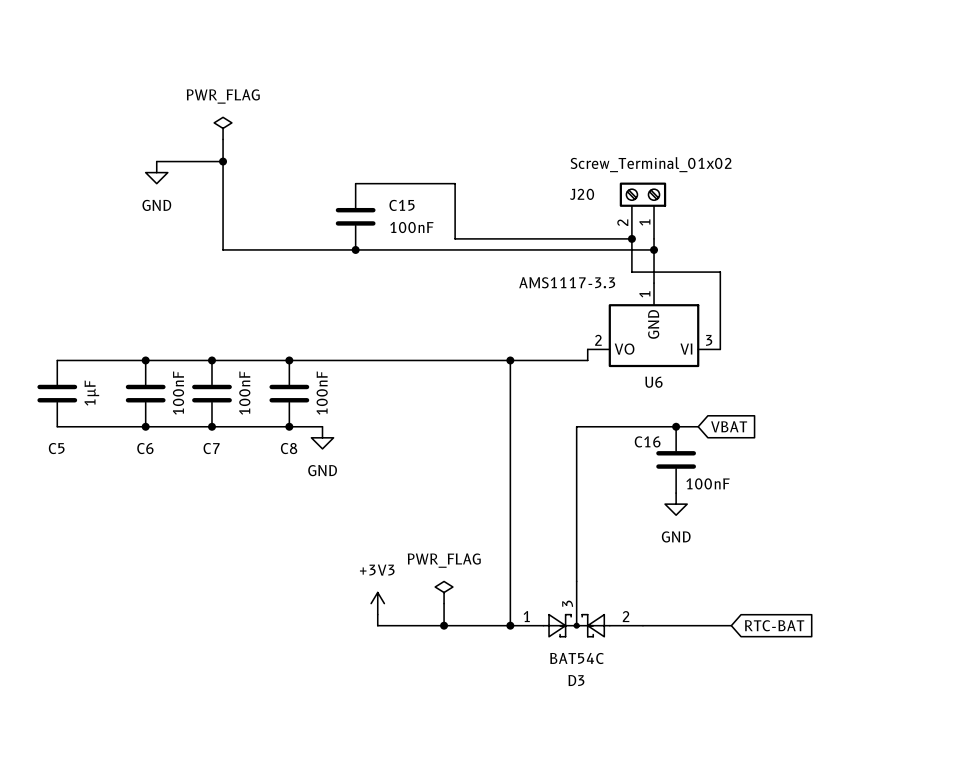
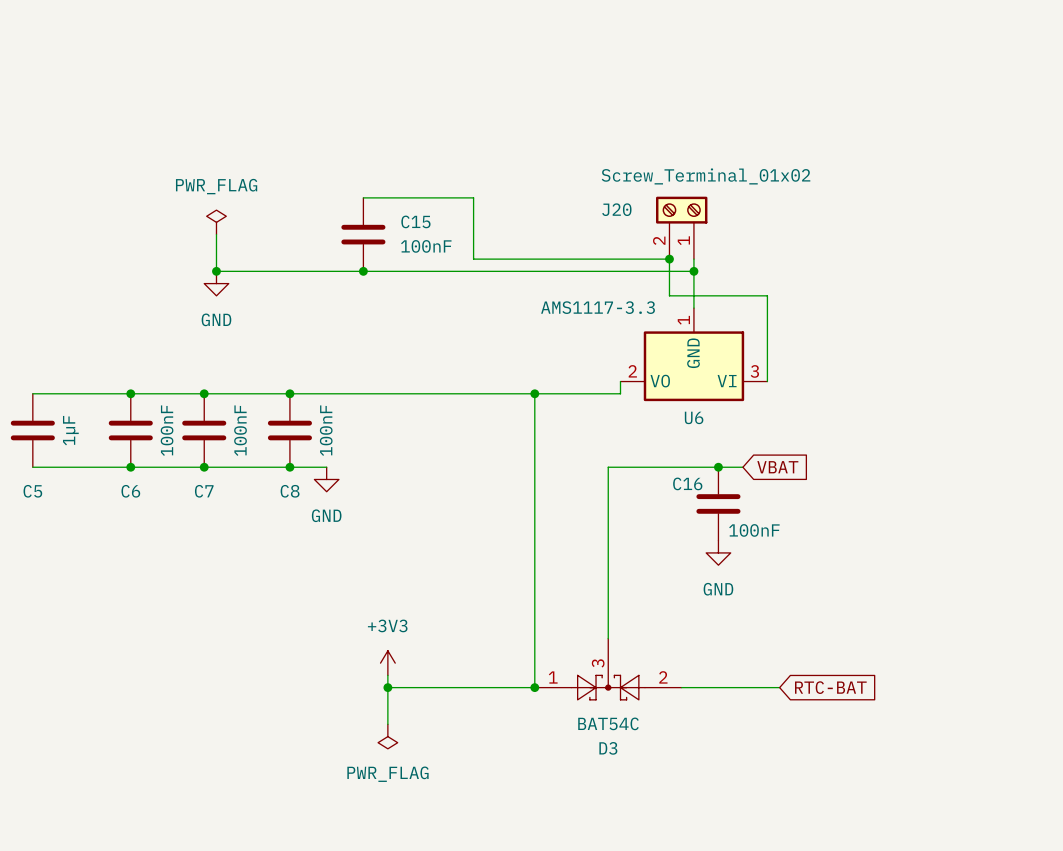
power symbol position: PWR_FLAG (223, 128) -> PWR_FLAG (216, 222)
wire: (223, 139) (223, 216) -> none
wire: (156, 161) (223, 161) -> none
junction: (223, 161) -> none
power symbol position: GND (156, 172) -> GND (216, 283)
junction: none -> (216, 271)
power symbol rotation: 0° (444, 592) -> 180° (387, 736)
power symbol position: PWR_FLAG (444, 592) -> PWR_FLAG (387, 736)
wire: (444, 603) (444, 625) -> none
wire: none -> (387, 687) (387, 724)
junction: none -> (387, 687)
junction: (444, 625) -> none

